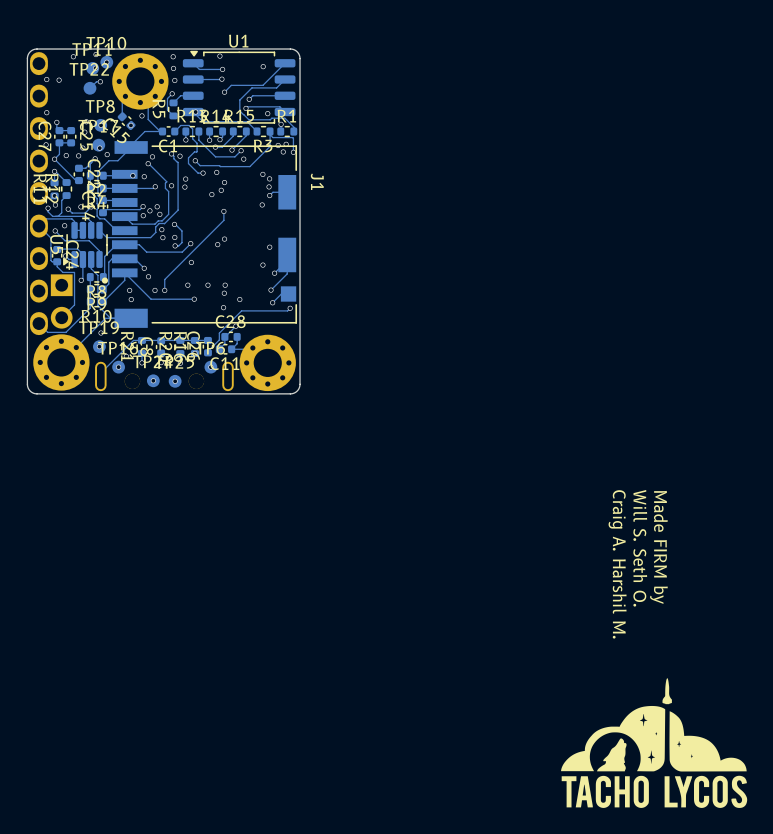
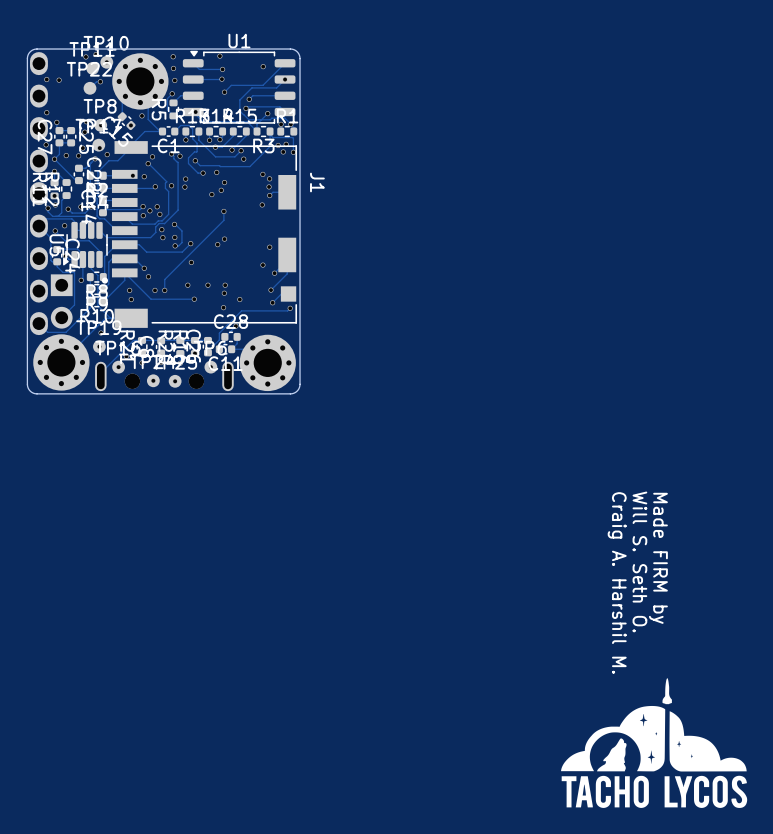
via: (73, 56) -> none
via: none -> (85, 56)
via: (95, 68) -> none
via: none -> (285, 79)
track: none -> (267, 113) (257, 124) (257, 131)
via: none -> (290, 124)

